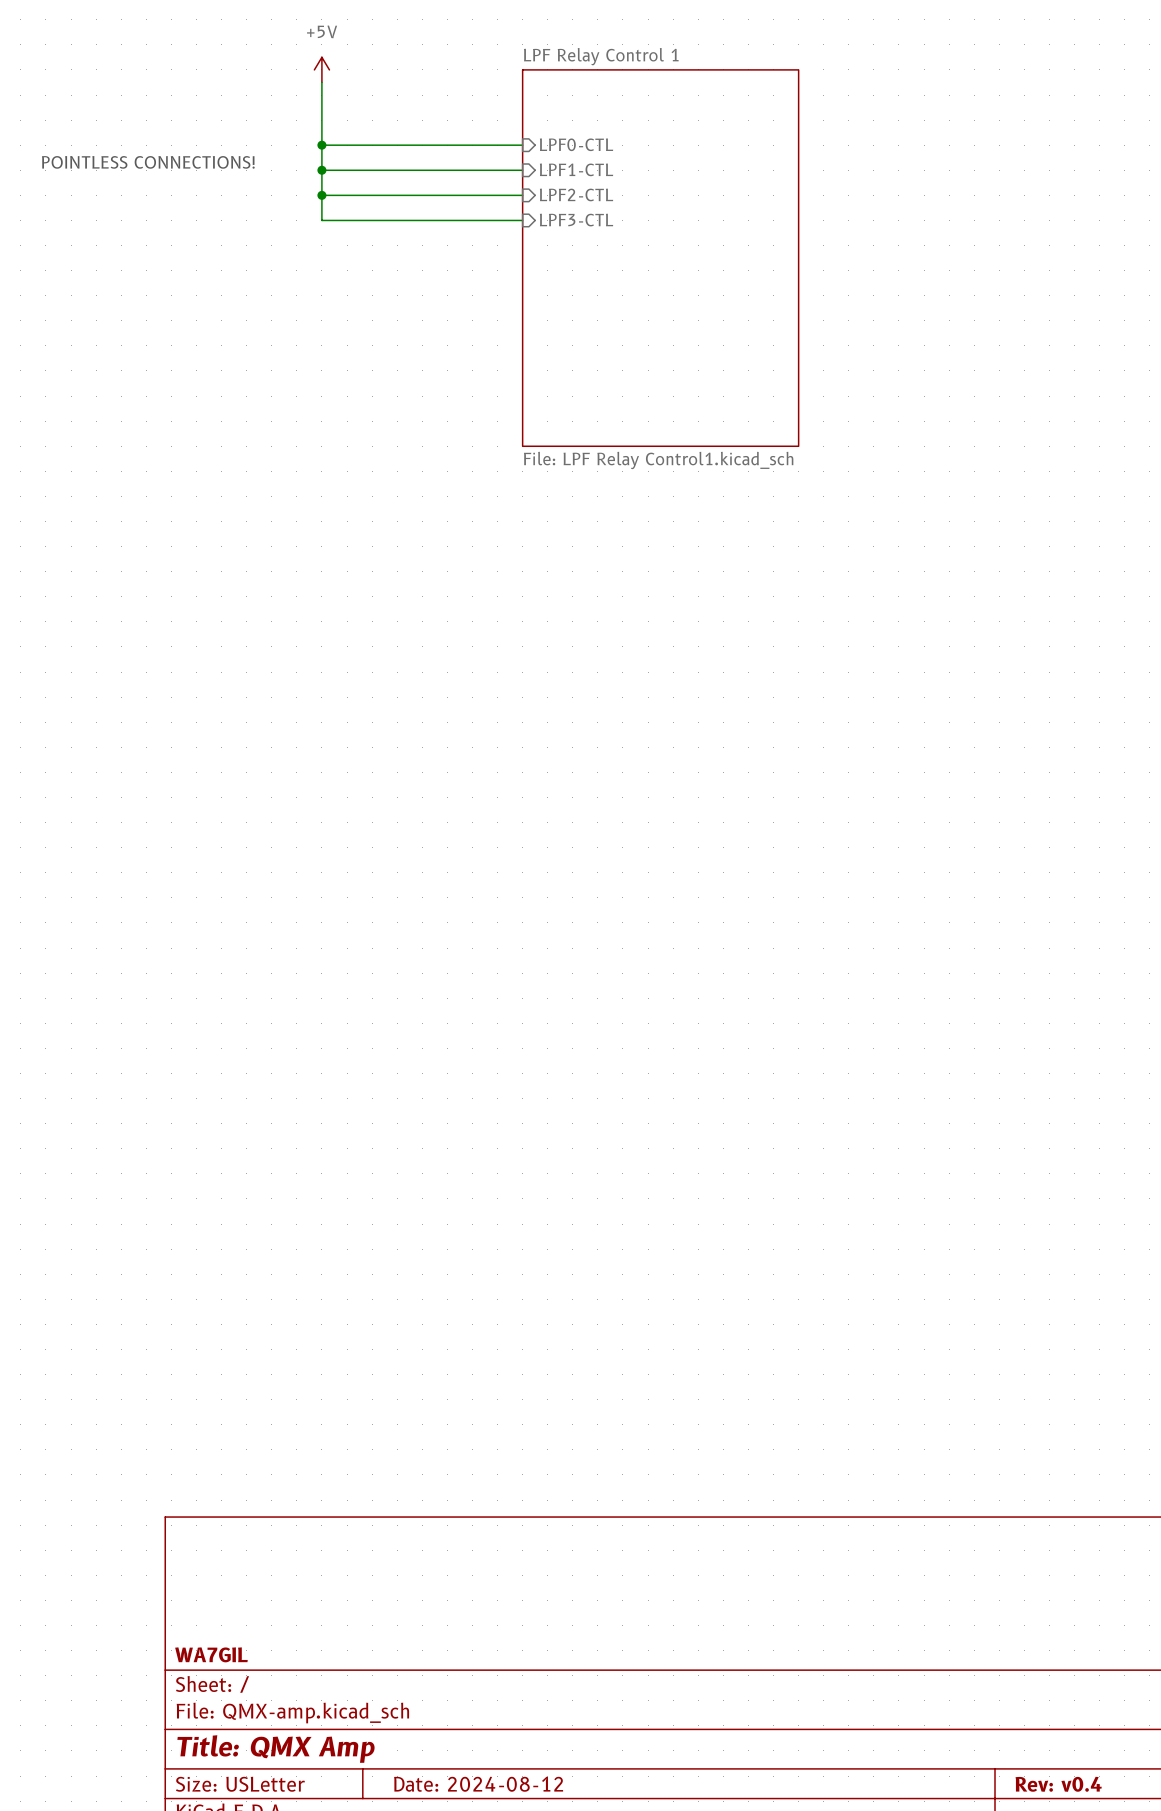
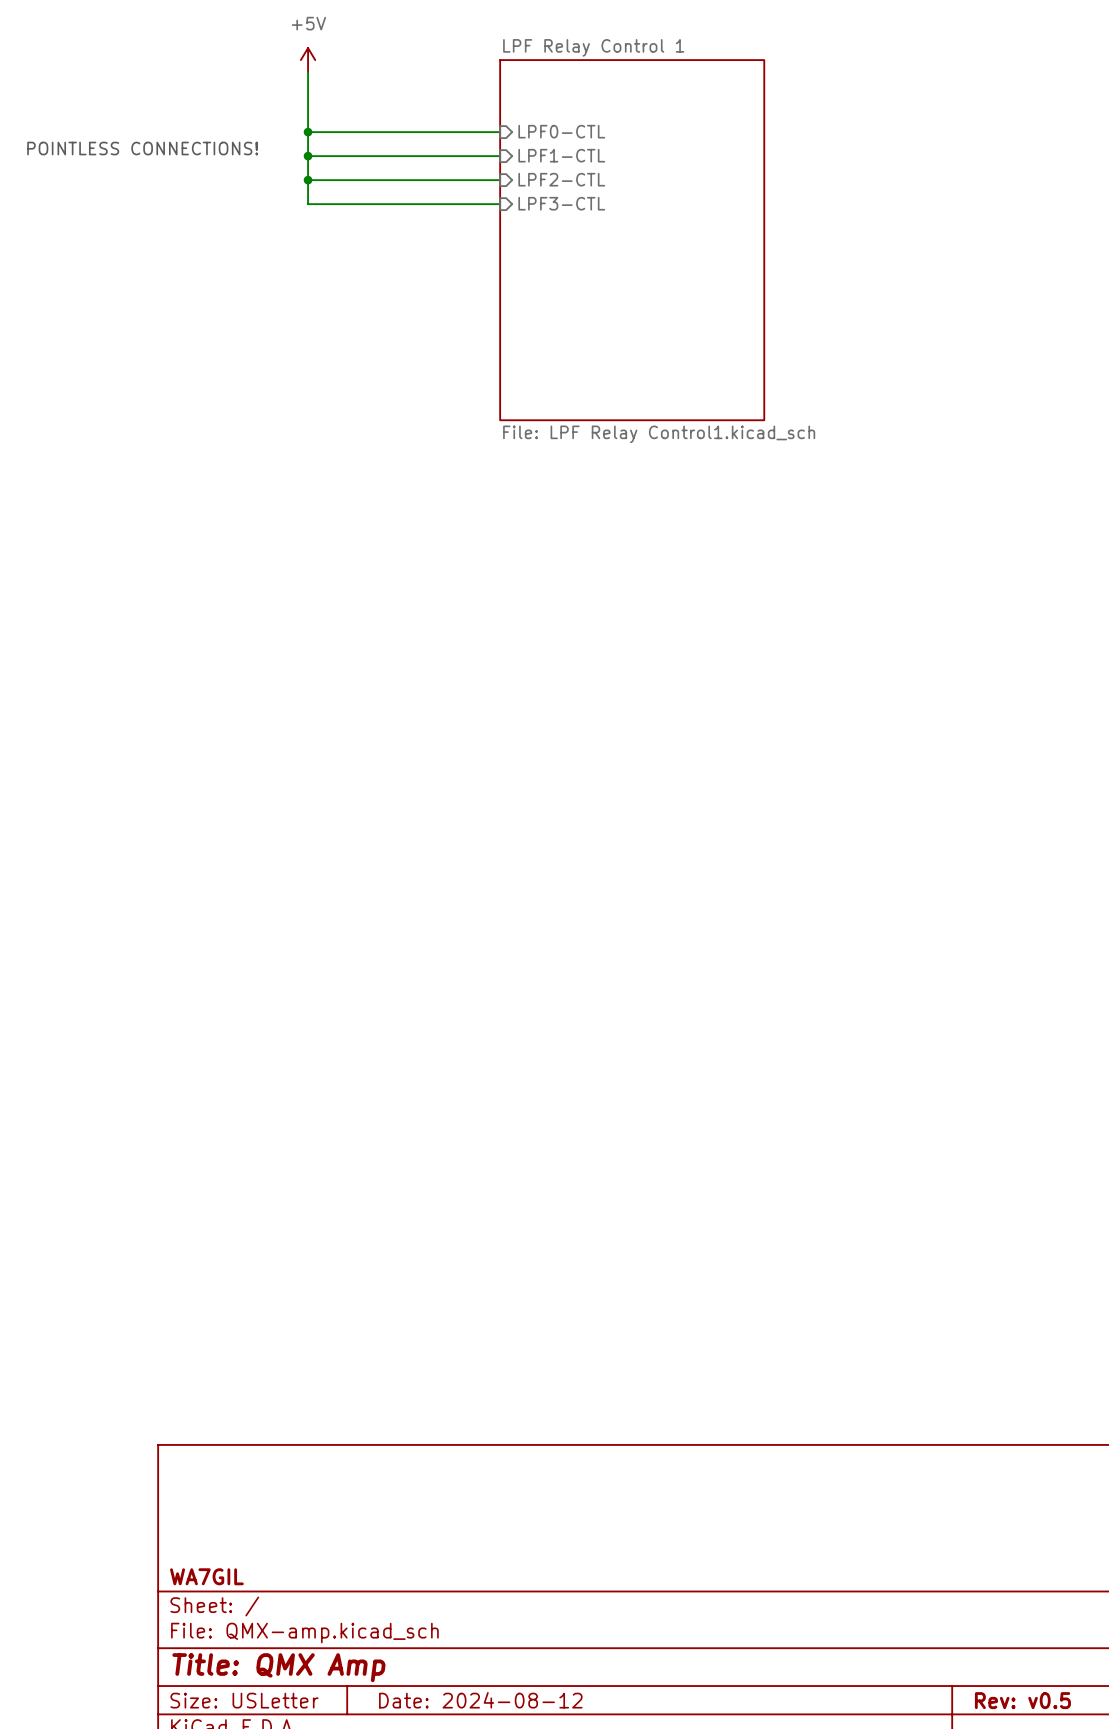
title block: Rev: v0.4 (1058, 1784) -> Rev: v0.5 (1022, 1700)

